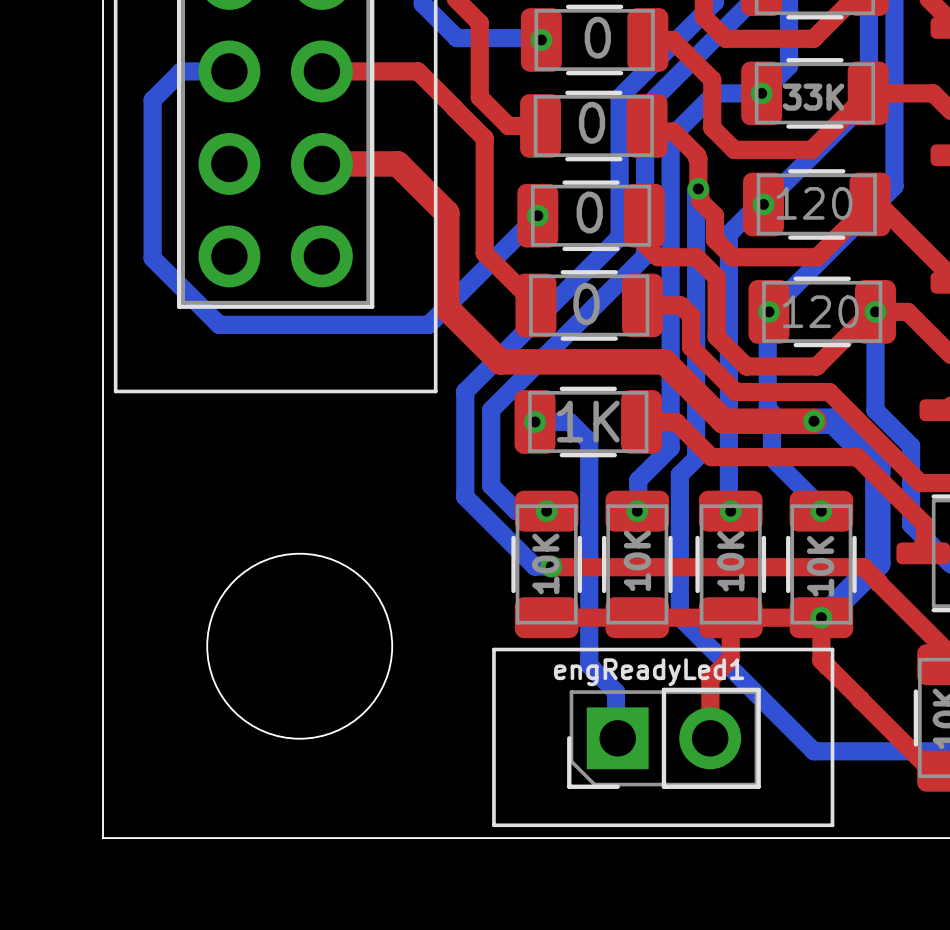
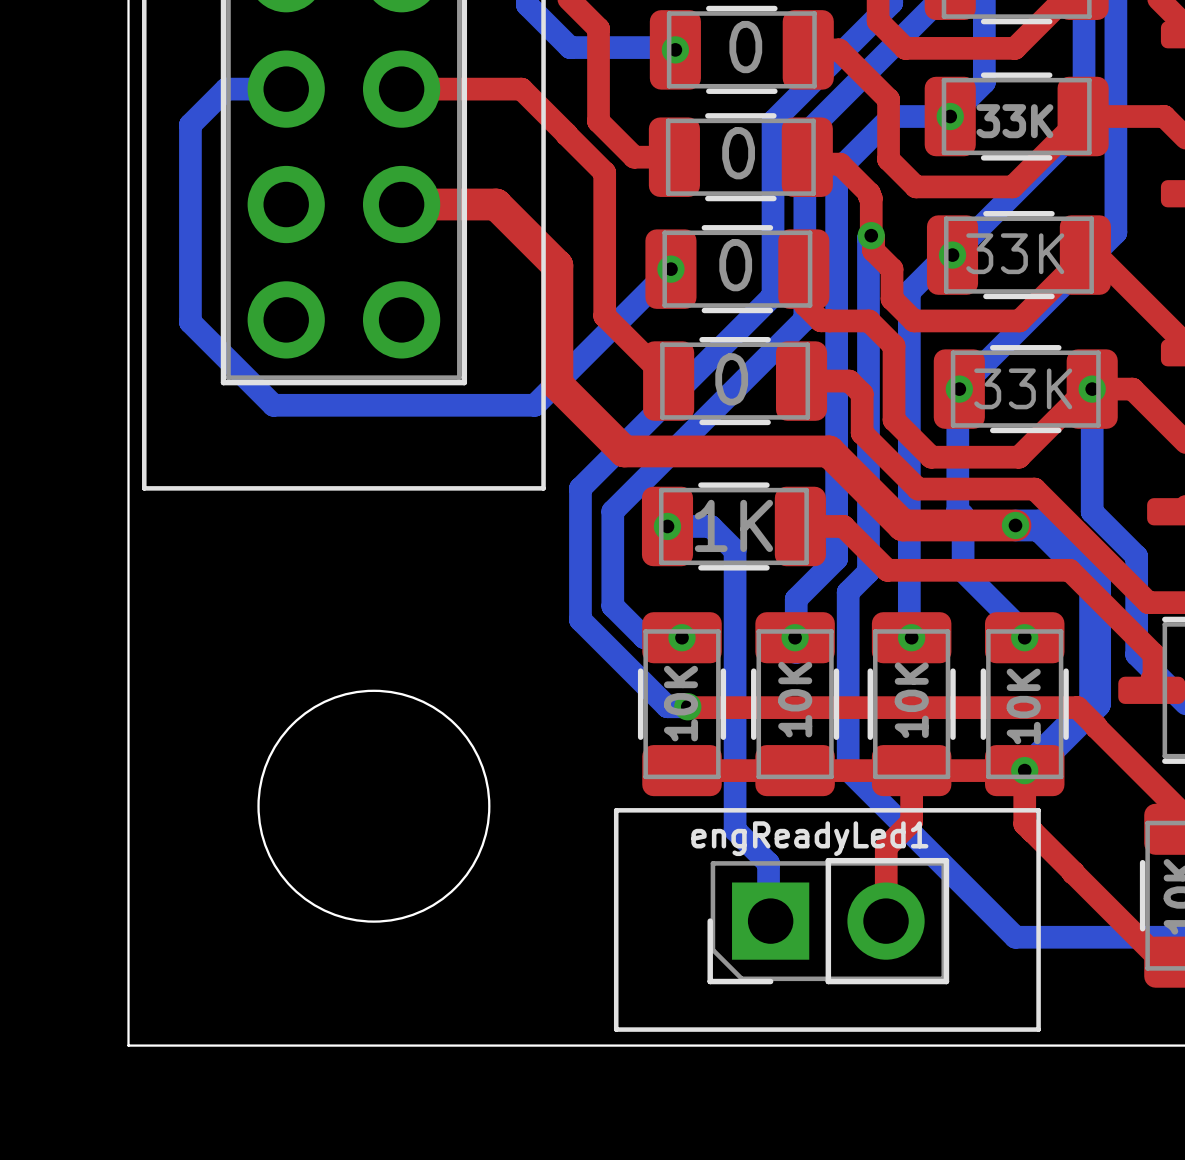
part value: 120 (814, 203) -> 33K (1015, 253)
part value: 120 (820, 311) -> 33K (1023, 388)

